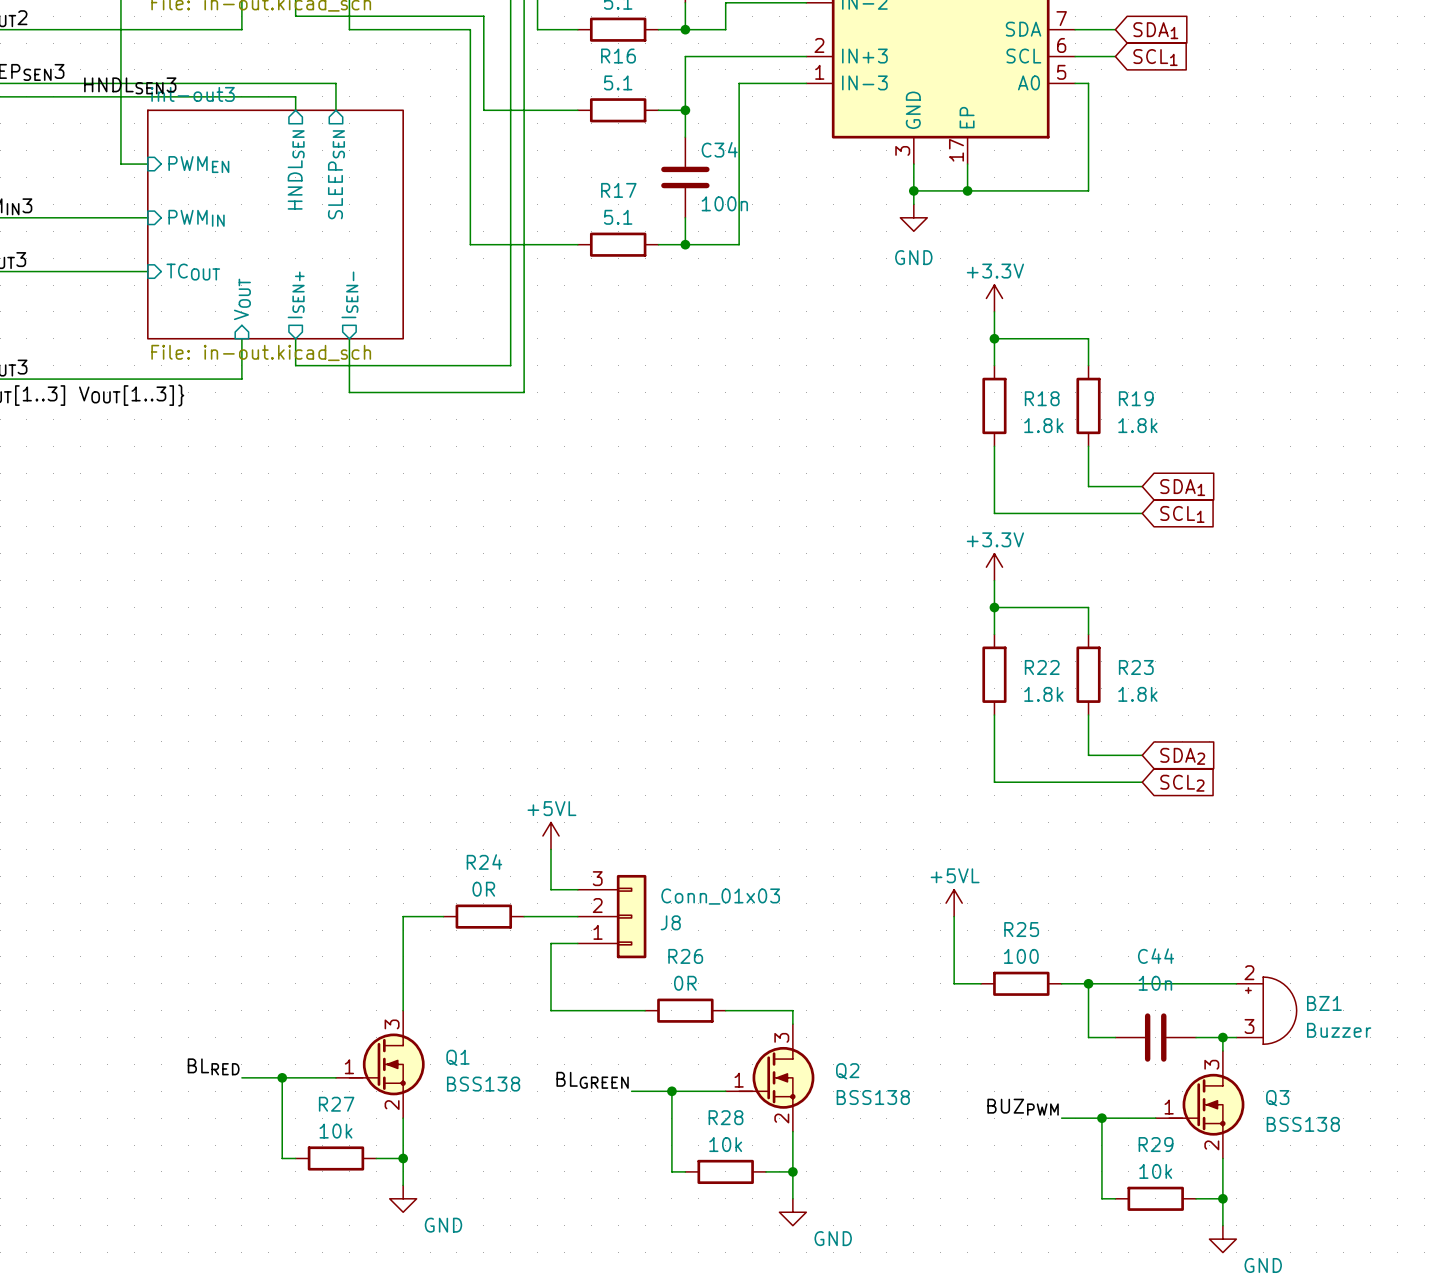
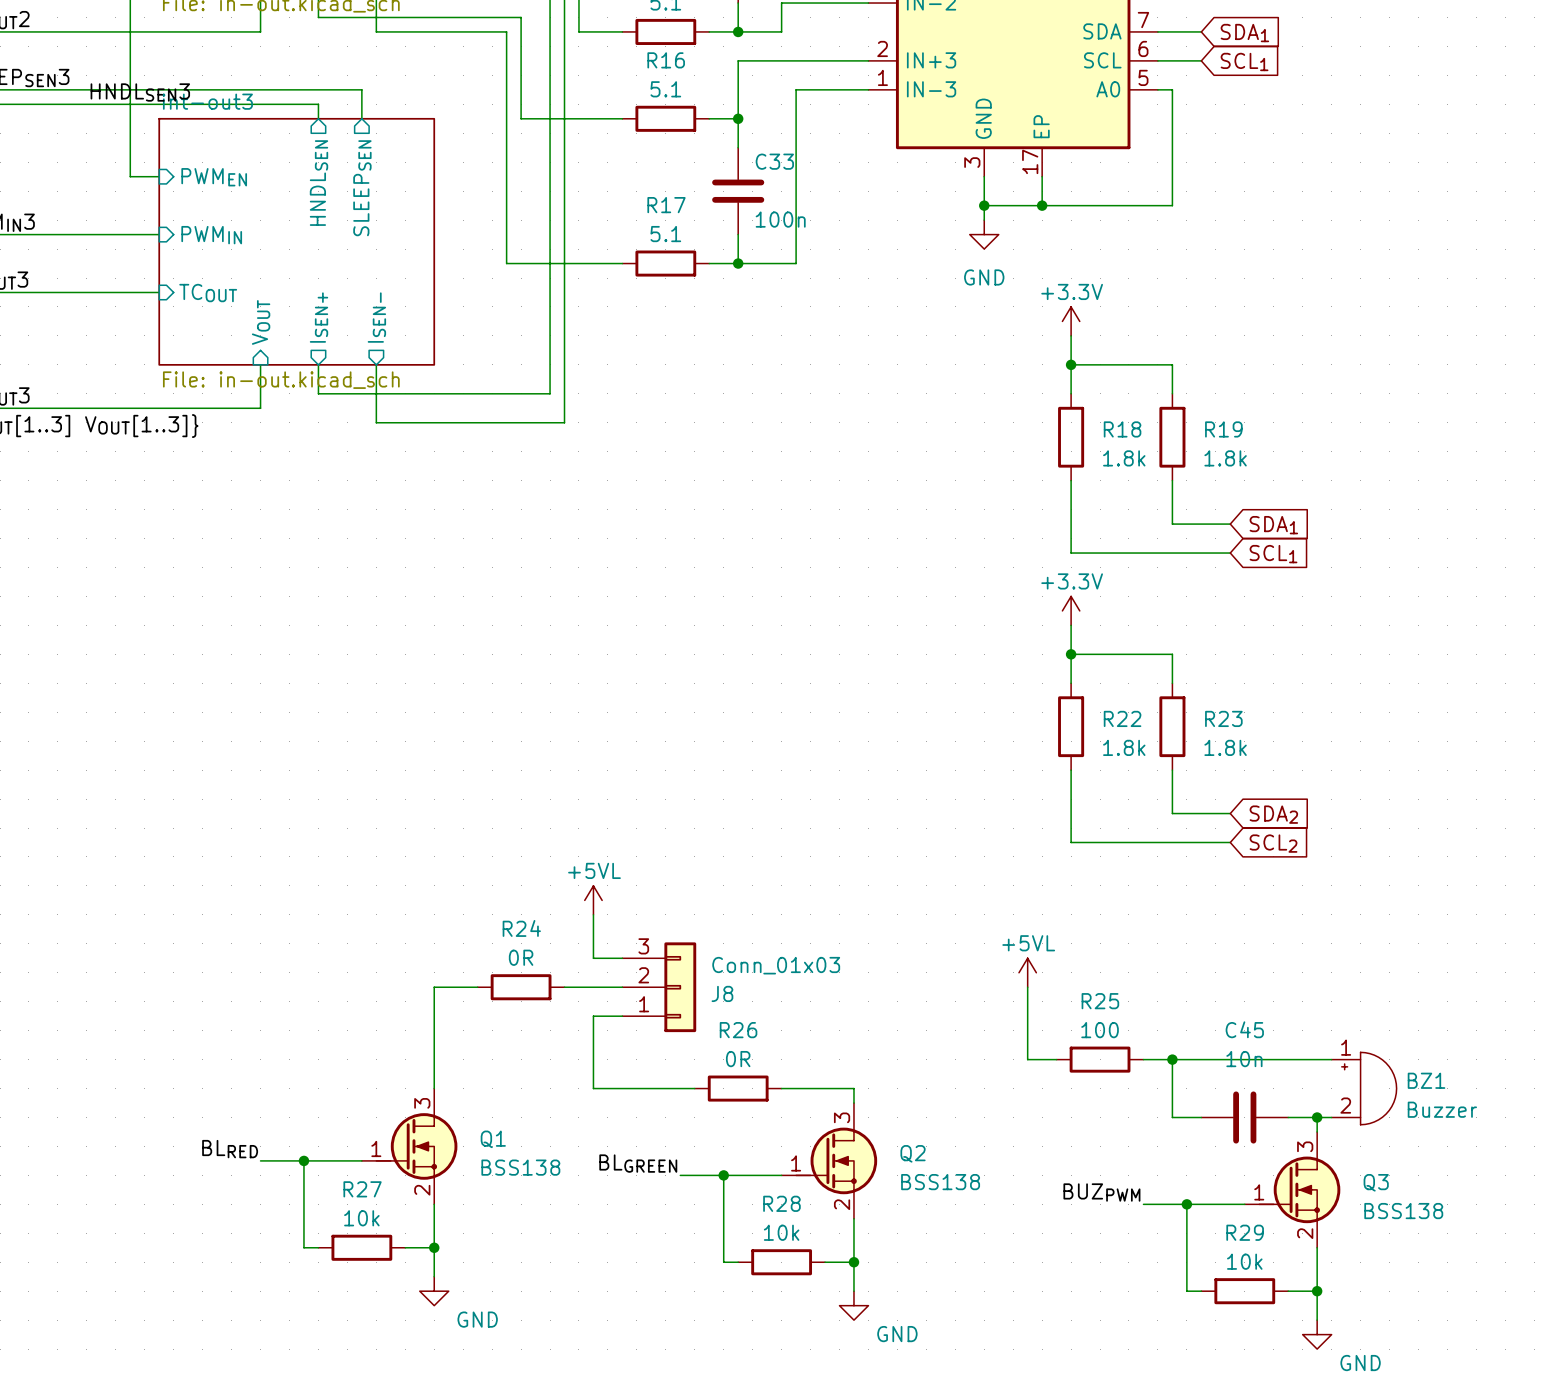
C34 name: C34 (719, 149) -> C33 (774, 161)
C44 name: C44 (1156, 956) -> C45 (1244, 1029)
BZ1 pin number: 2 (1249, 972) -> 1 (1346, 1047)
BZ1 pin number: 3 (1249, 1026) -> 2 (1345, 1105)

